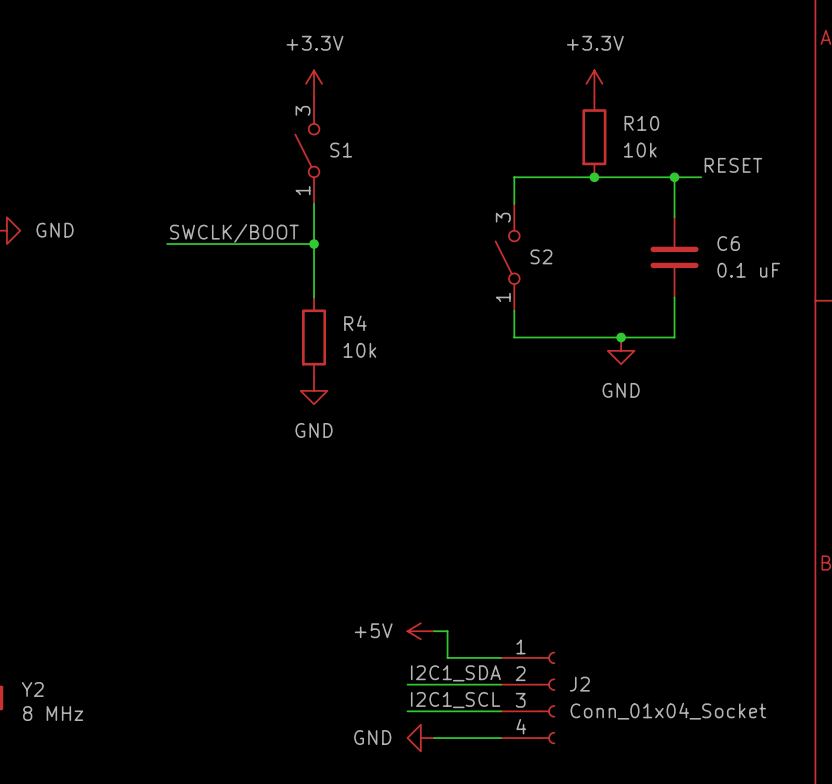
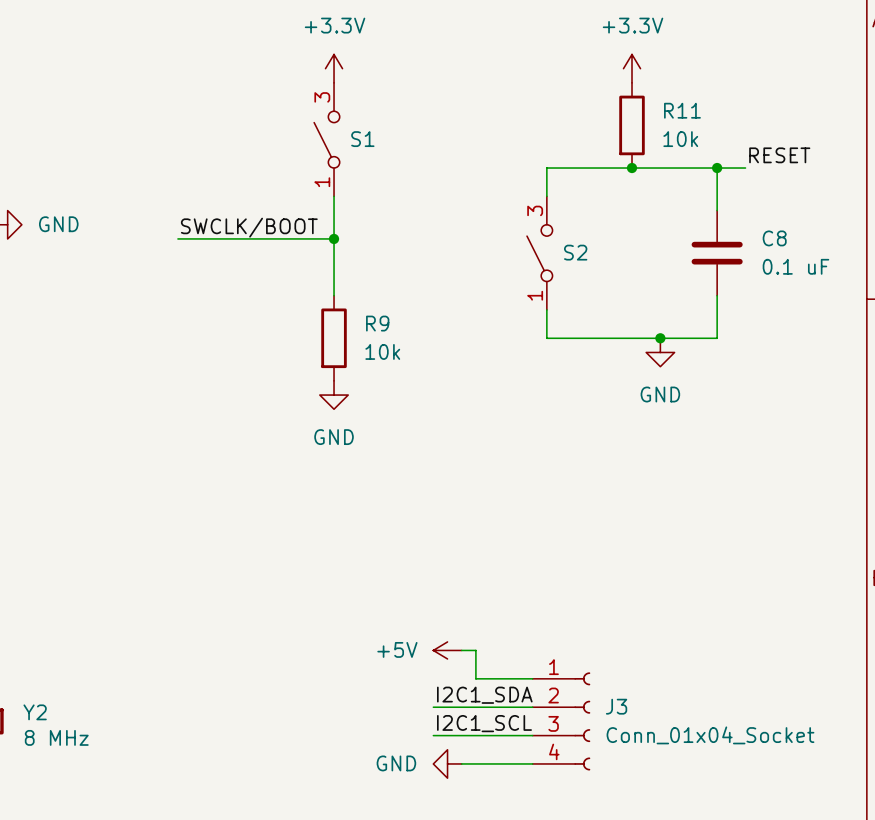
R10 name: R10 (641, 123) -> R11 (682, 110)
C6 name: C6 (728, 243) -> C8 (774, 238)
R4 name: R4 (355, 323) -> R9 (377, 323)
J2 name: J2 (579, 684) -> J3 (616, 706)

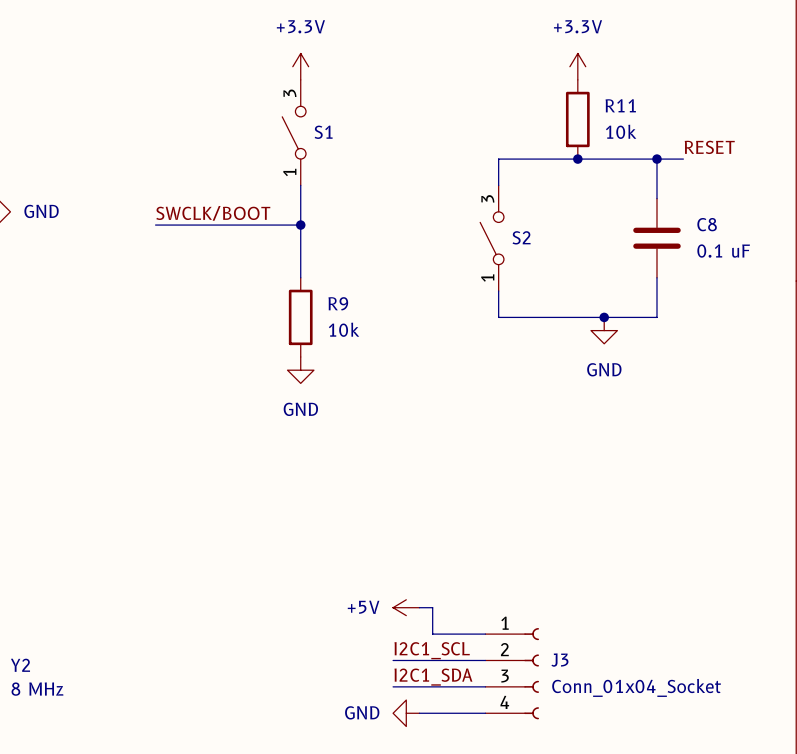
label: I2C1_SDA (484, 695) -> I2C1_SCL (432, 650)
label: I2C1_SCL (484, 723) -> I2C1_SDA (433, 677)

